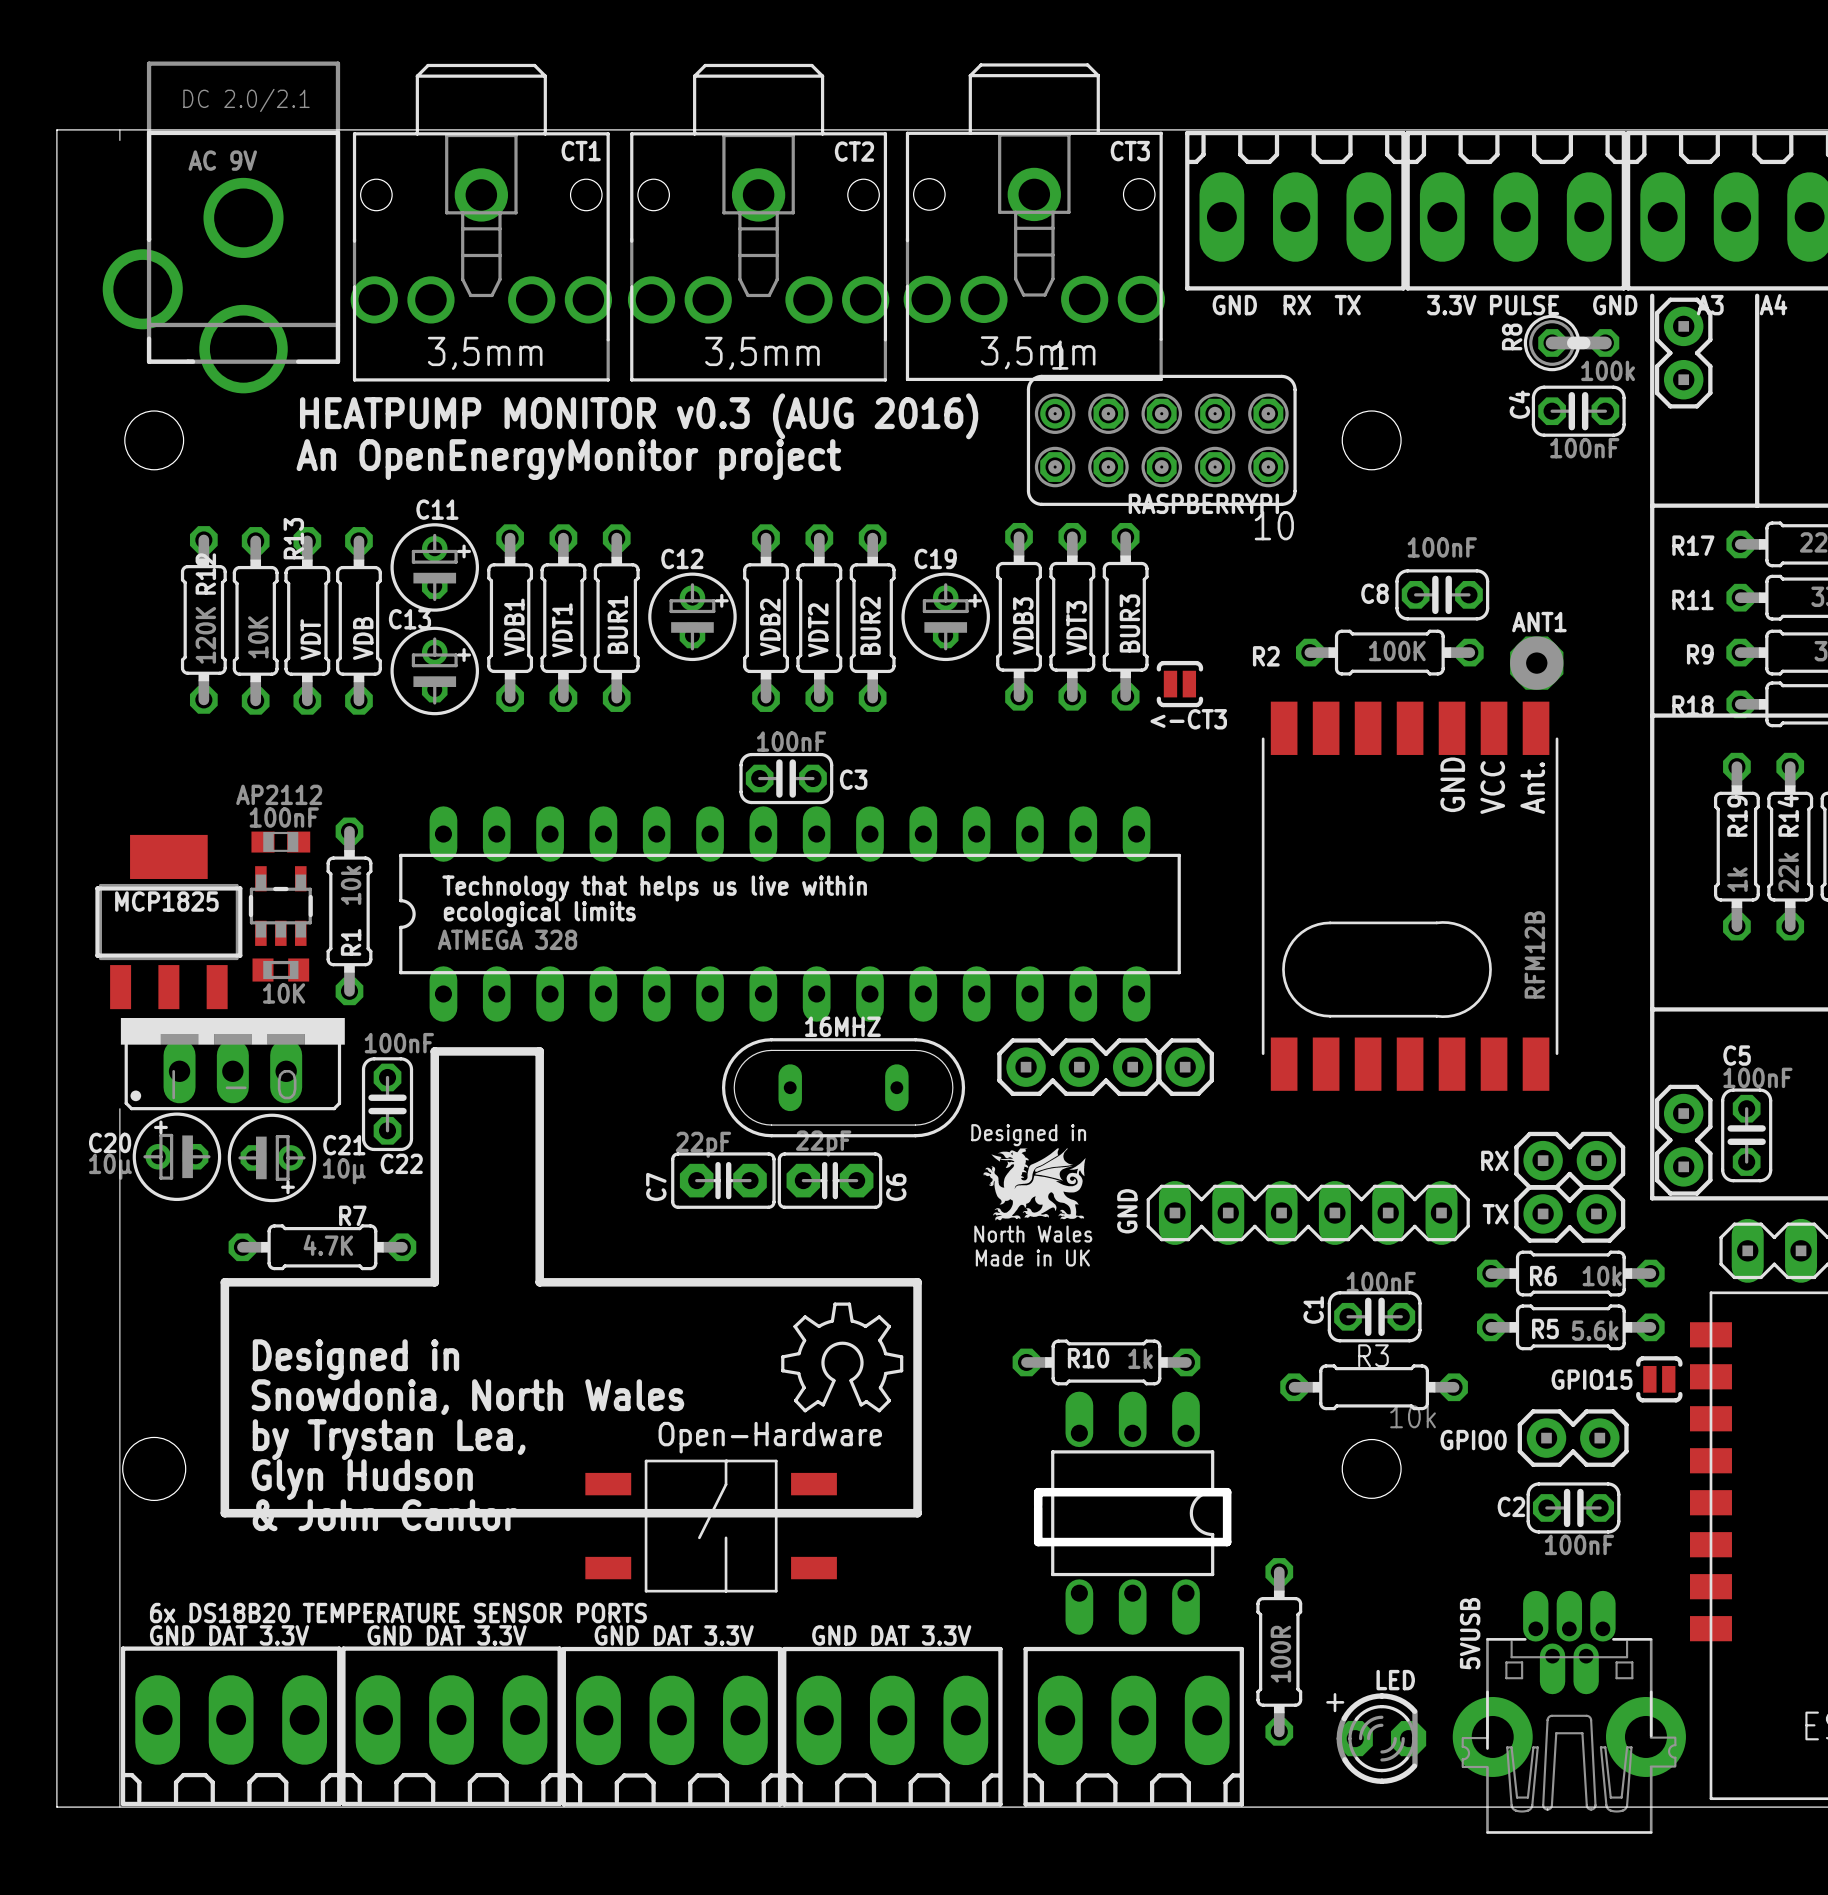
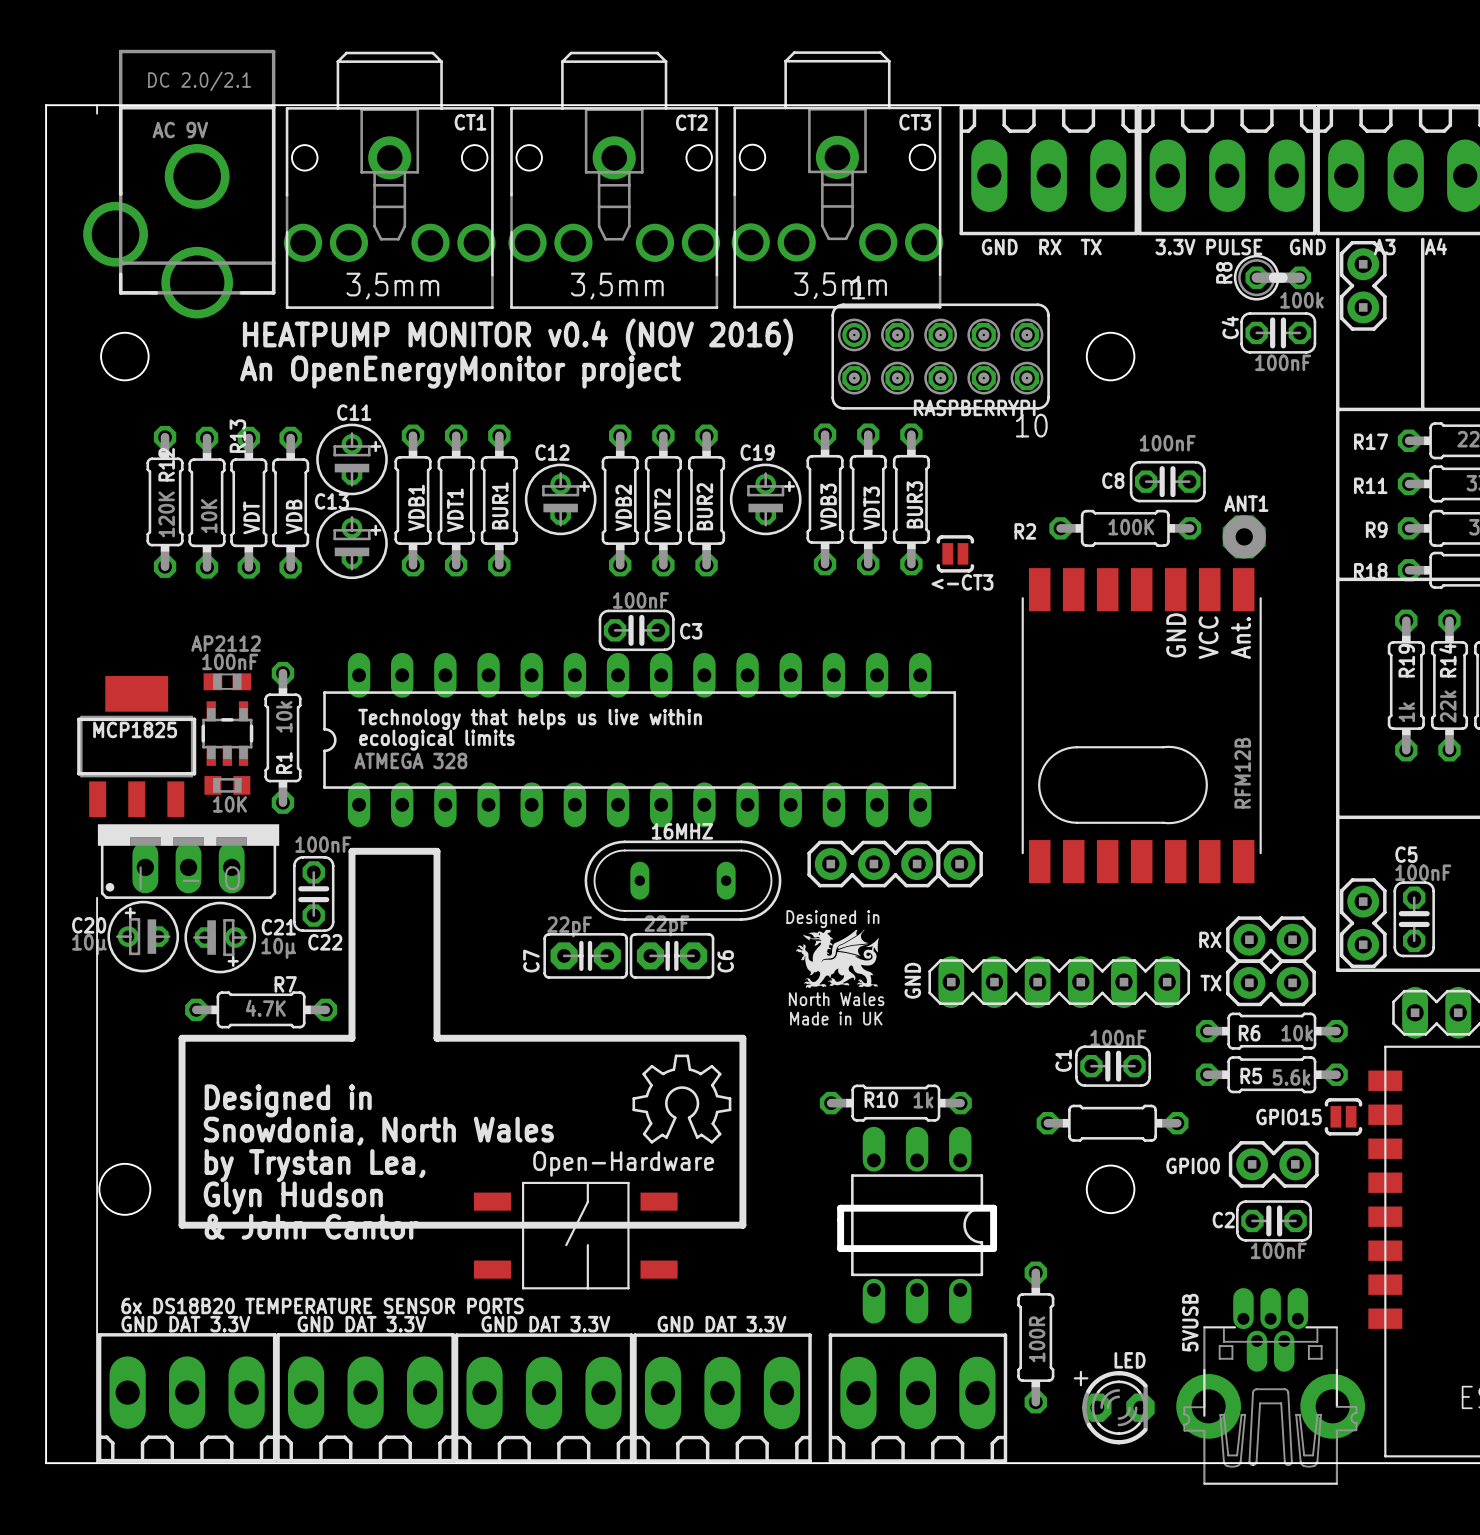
text: HEATPUMP MONITOR v0.3 (AUG 2016) (639, 416) -> HEATPUMP MONITOR v0.4 (NOV 2016) (517, 337)
R3 name: R3 (1373, 1355) -> none
R3 value: 10k (1413, 1416) -> none

